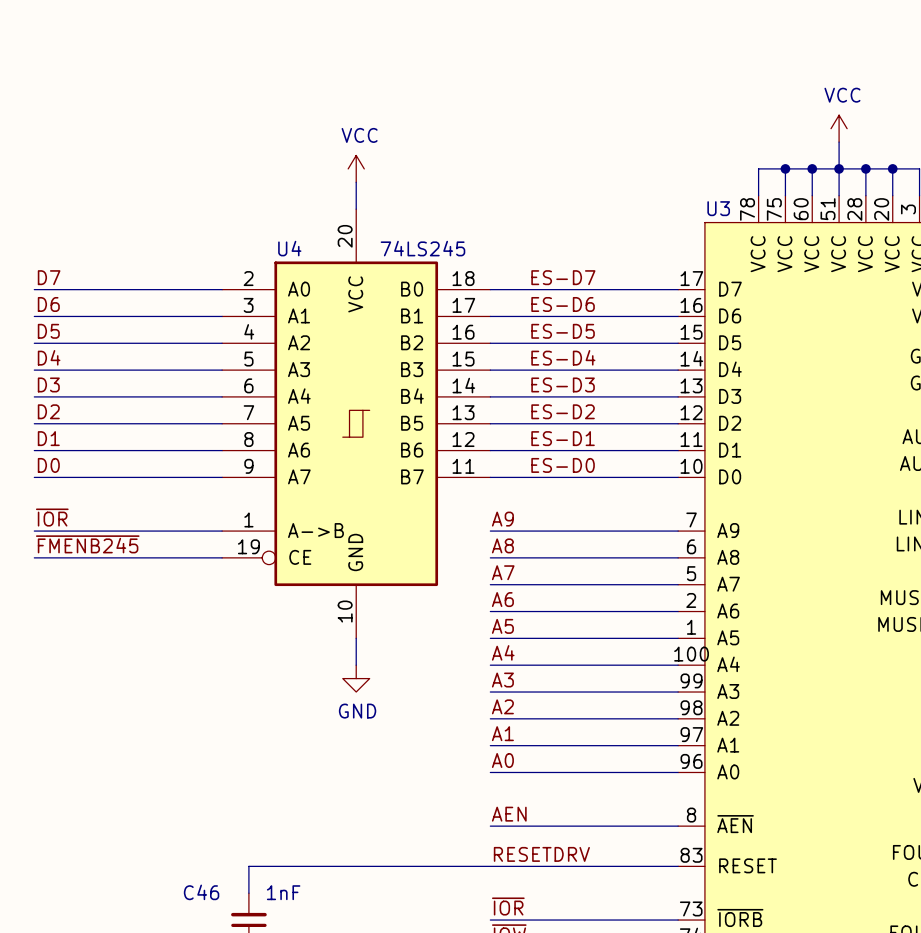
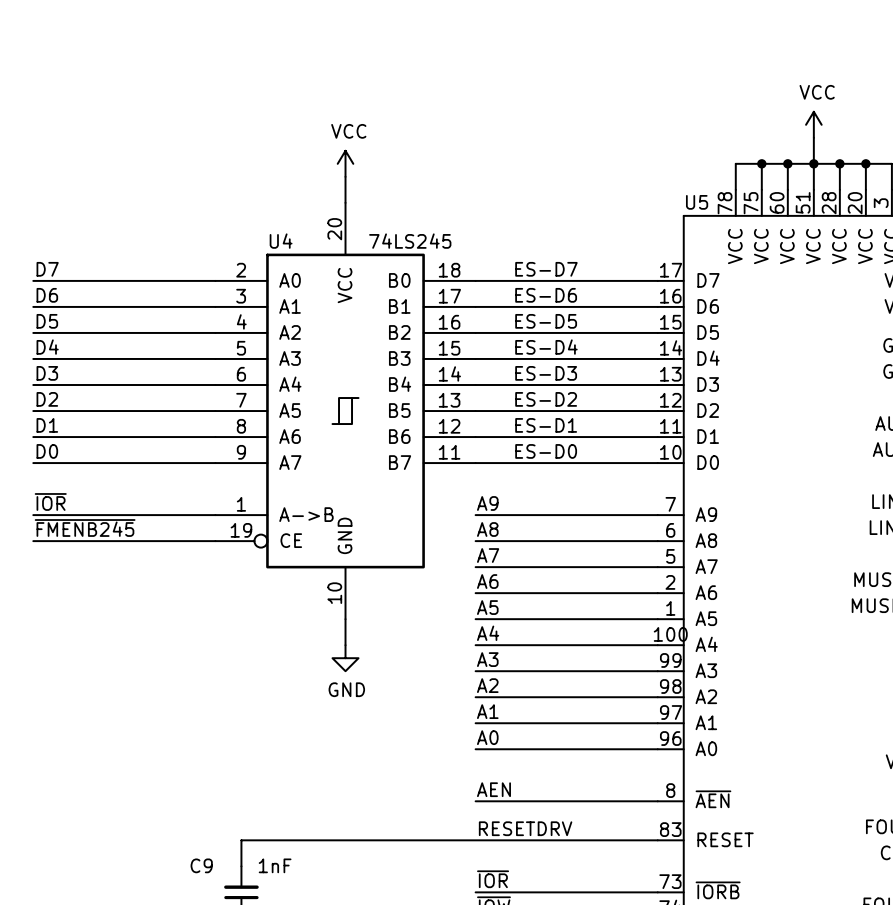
U3 name: U3 (718, 208) -> U5 (697, 202)
C46 name: C46 (201, 892) -> C9 (201, 865)

